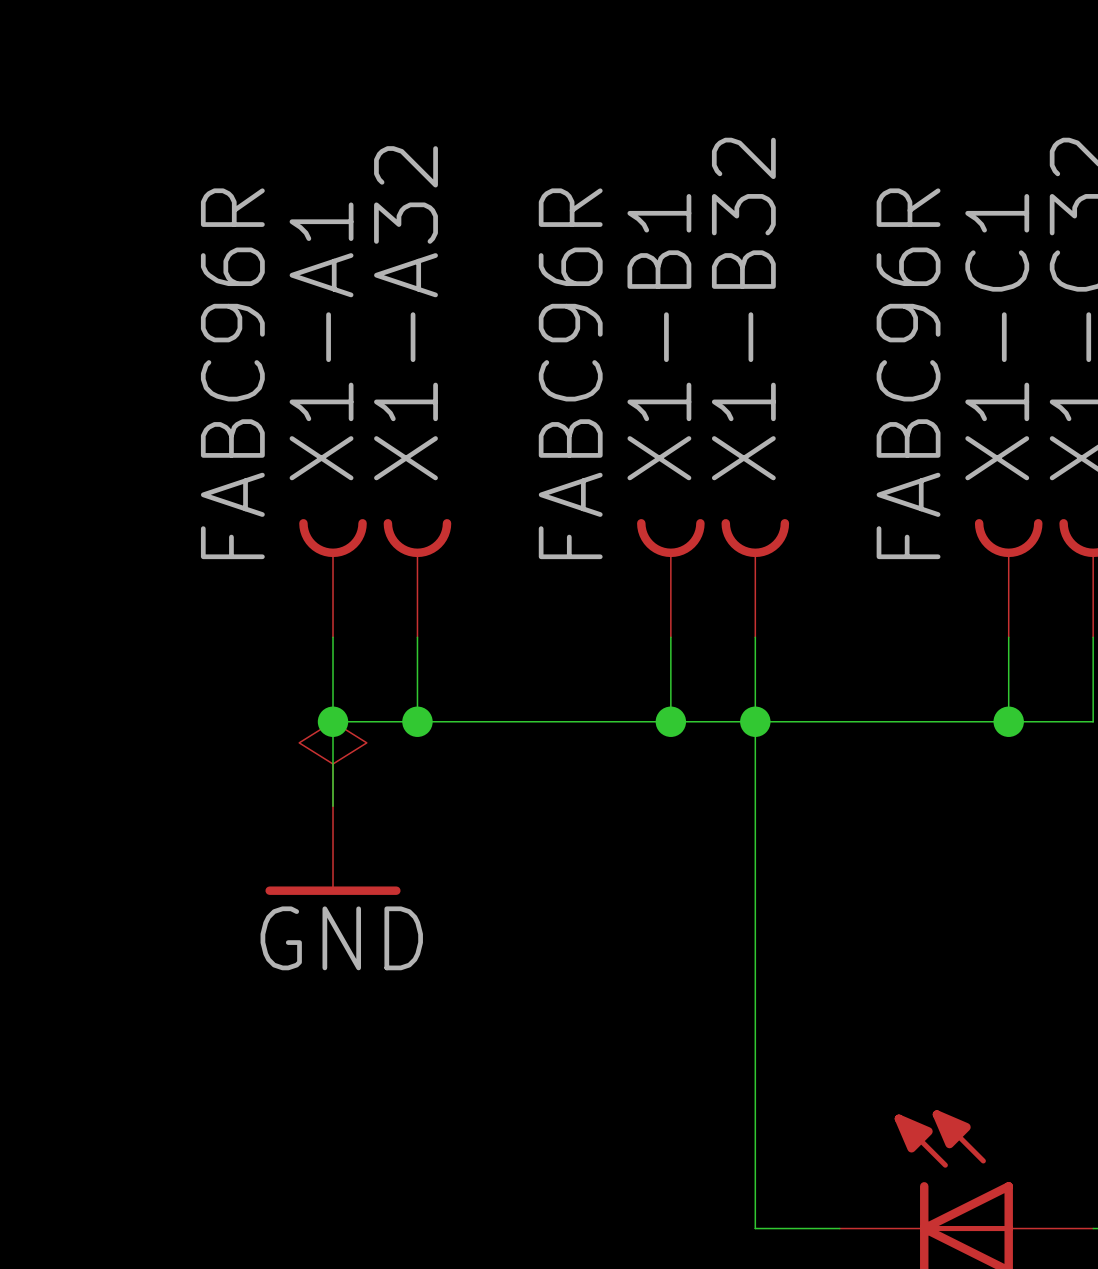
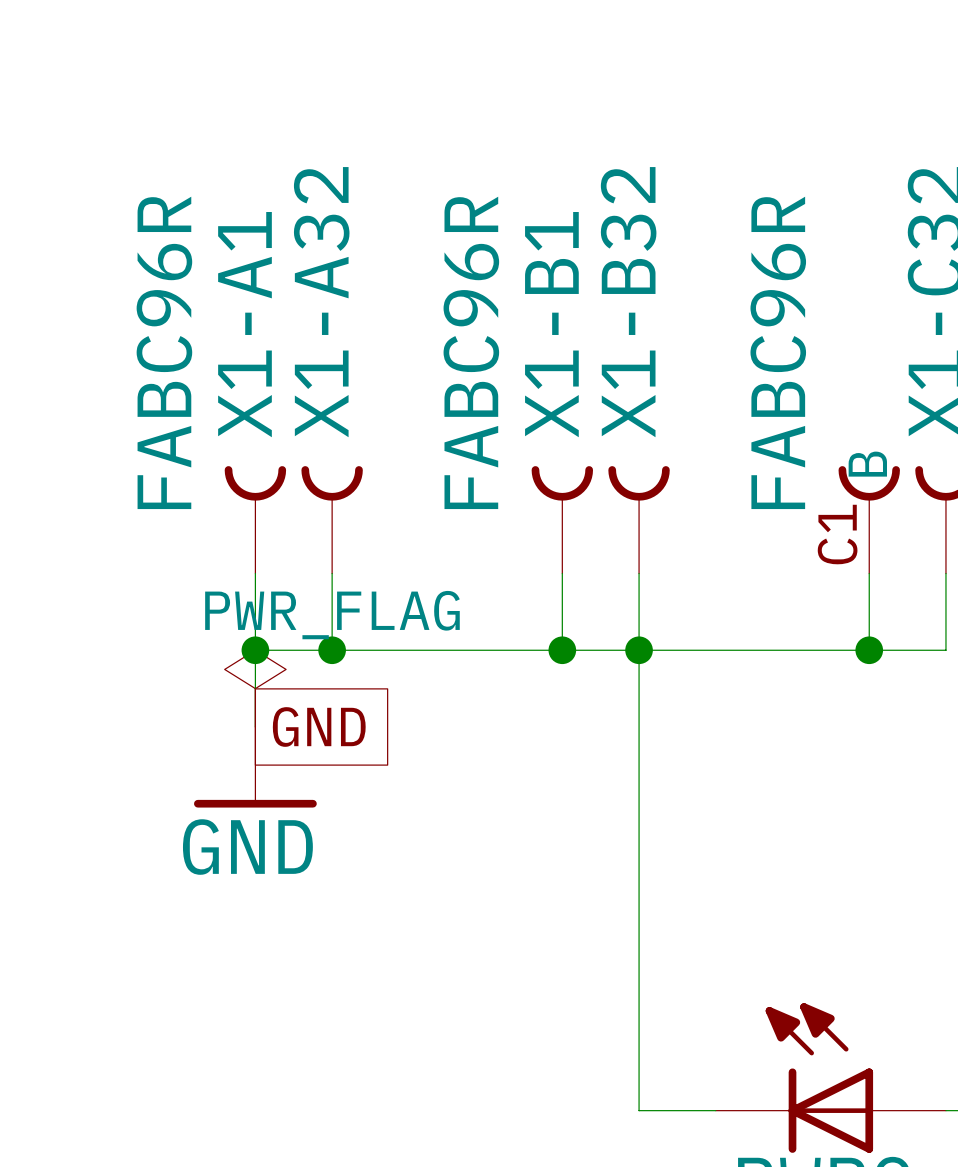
part text: X1-C1 (997, 337) -> none
part pin name: none -> B (867, 464)
part pin number: none -> C1 (837, 534)
power symbol text: none -> PWR_FLAG (332, 615)
global label: none -> GND (319, 726)

